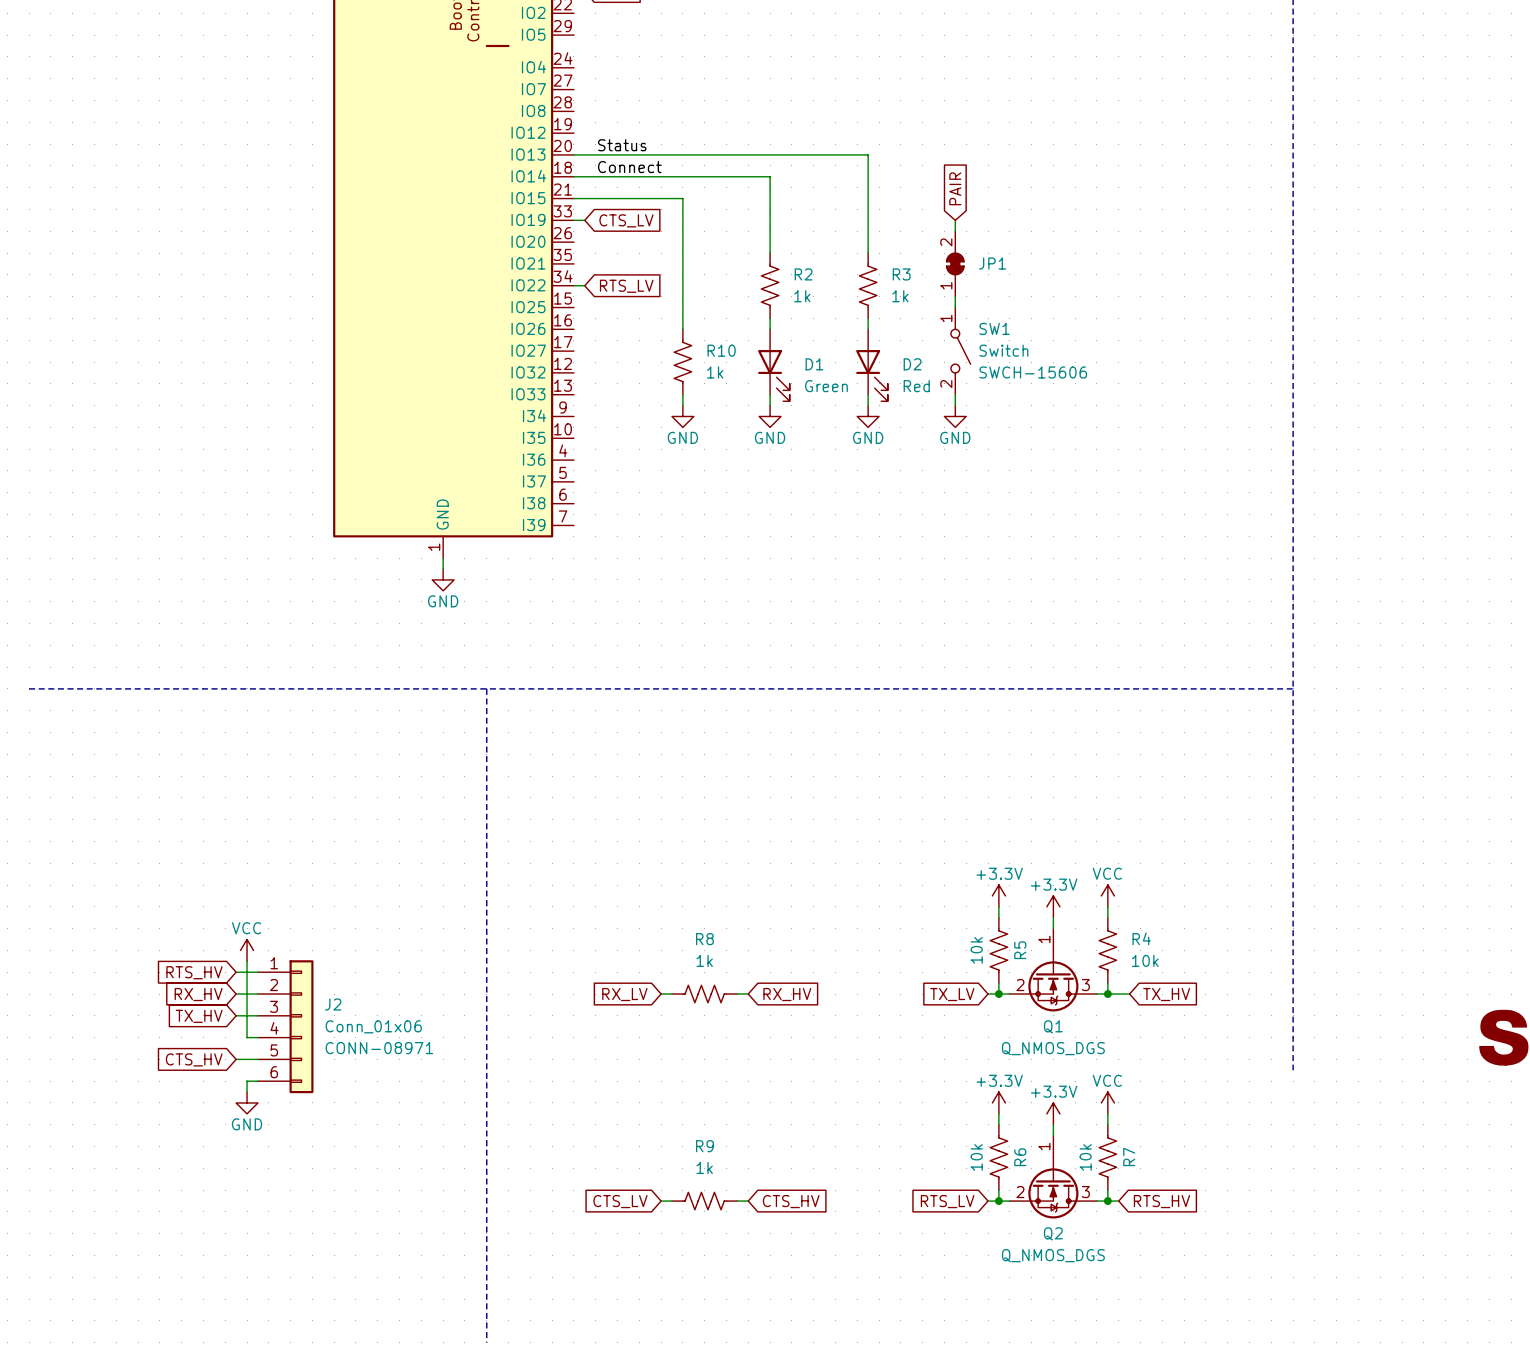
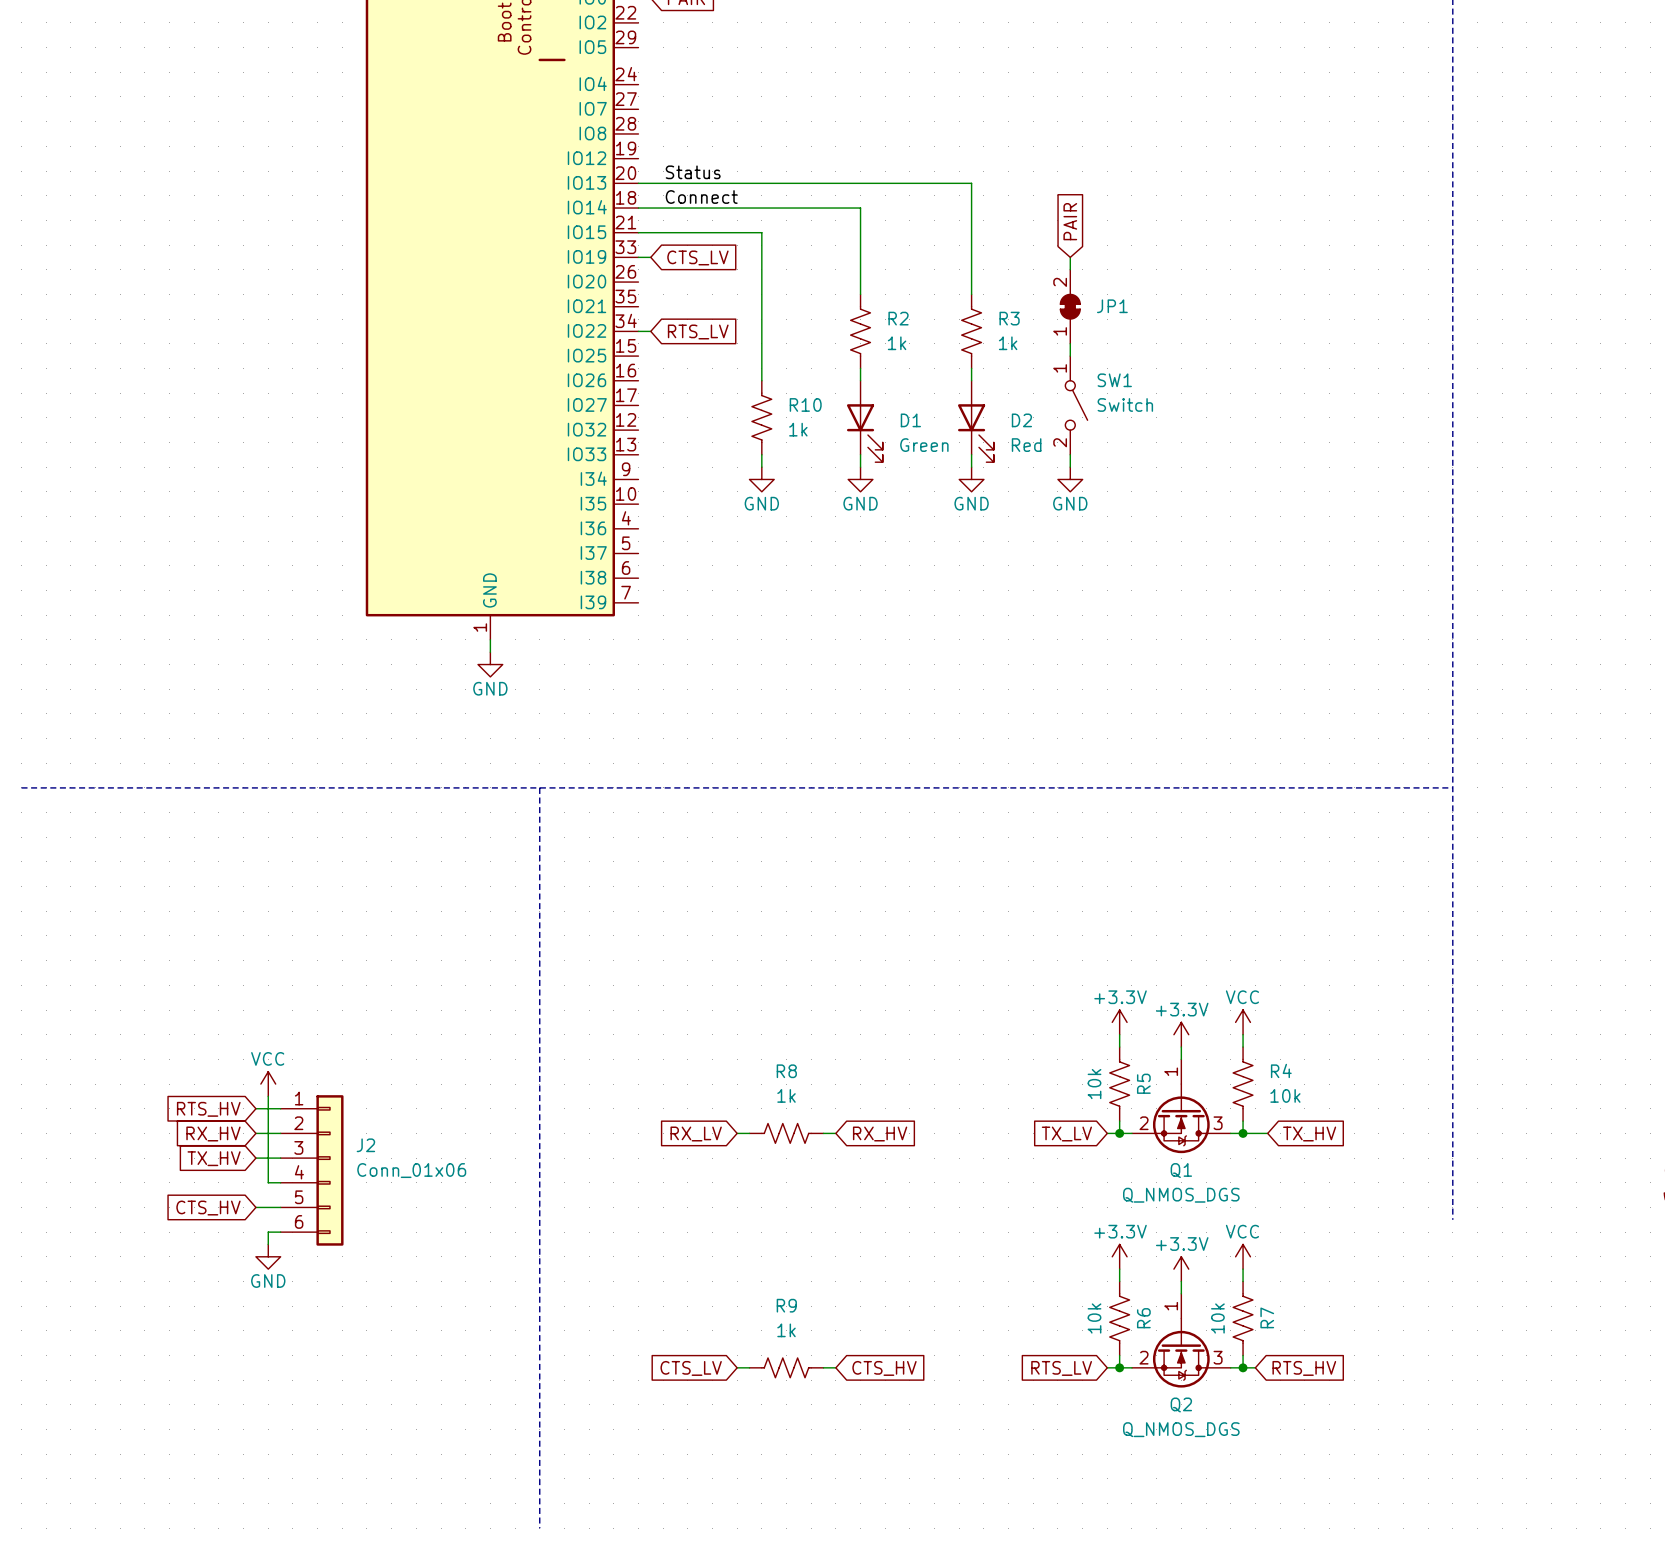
SW1 text: SWCH-15606 (1033, 372) -> none
J2 text: CONN-08971 (379, 1048) -> none

